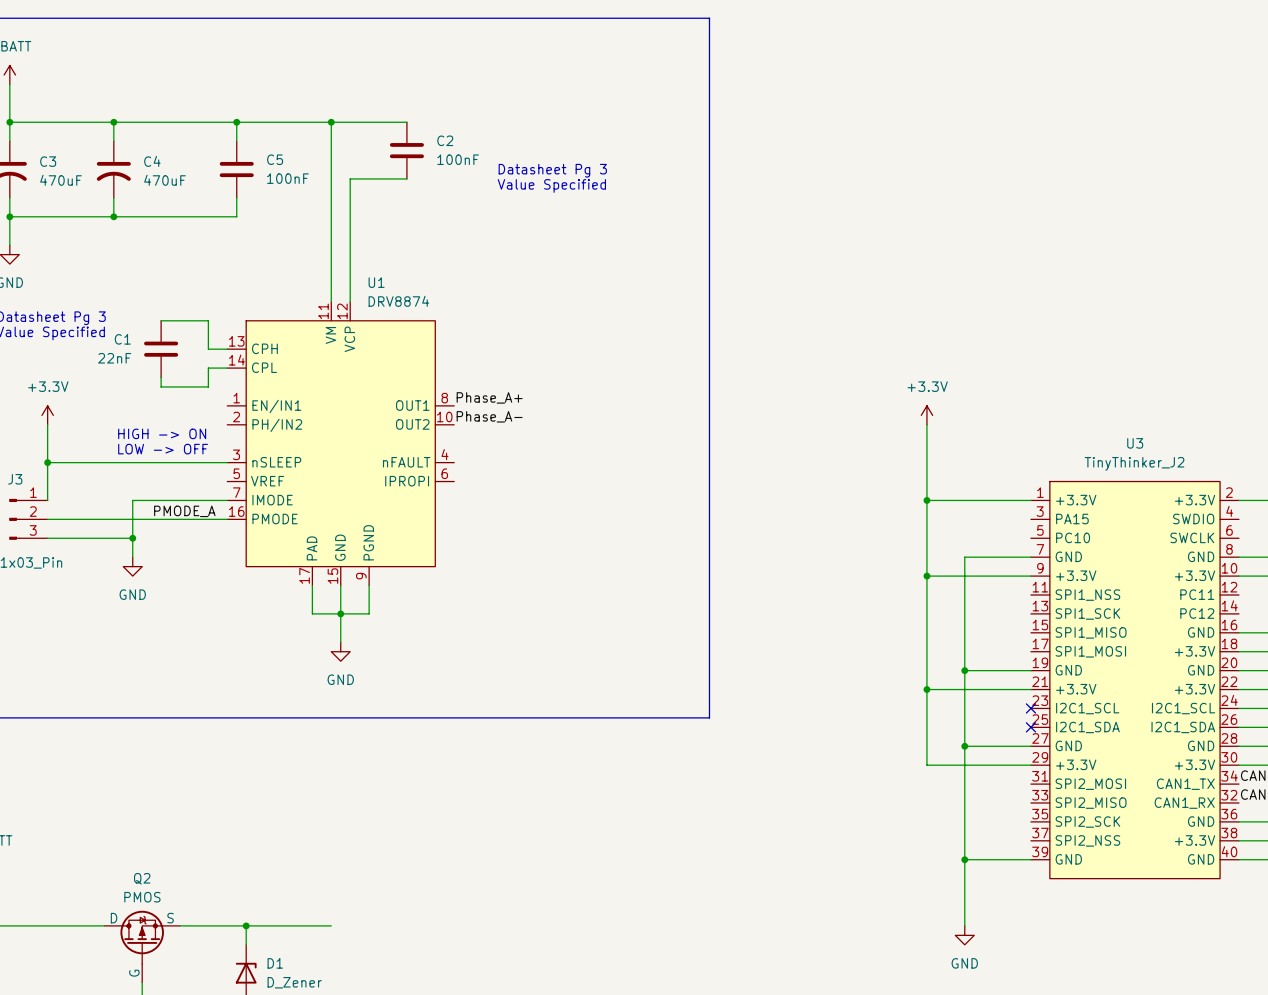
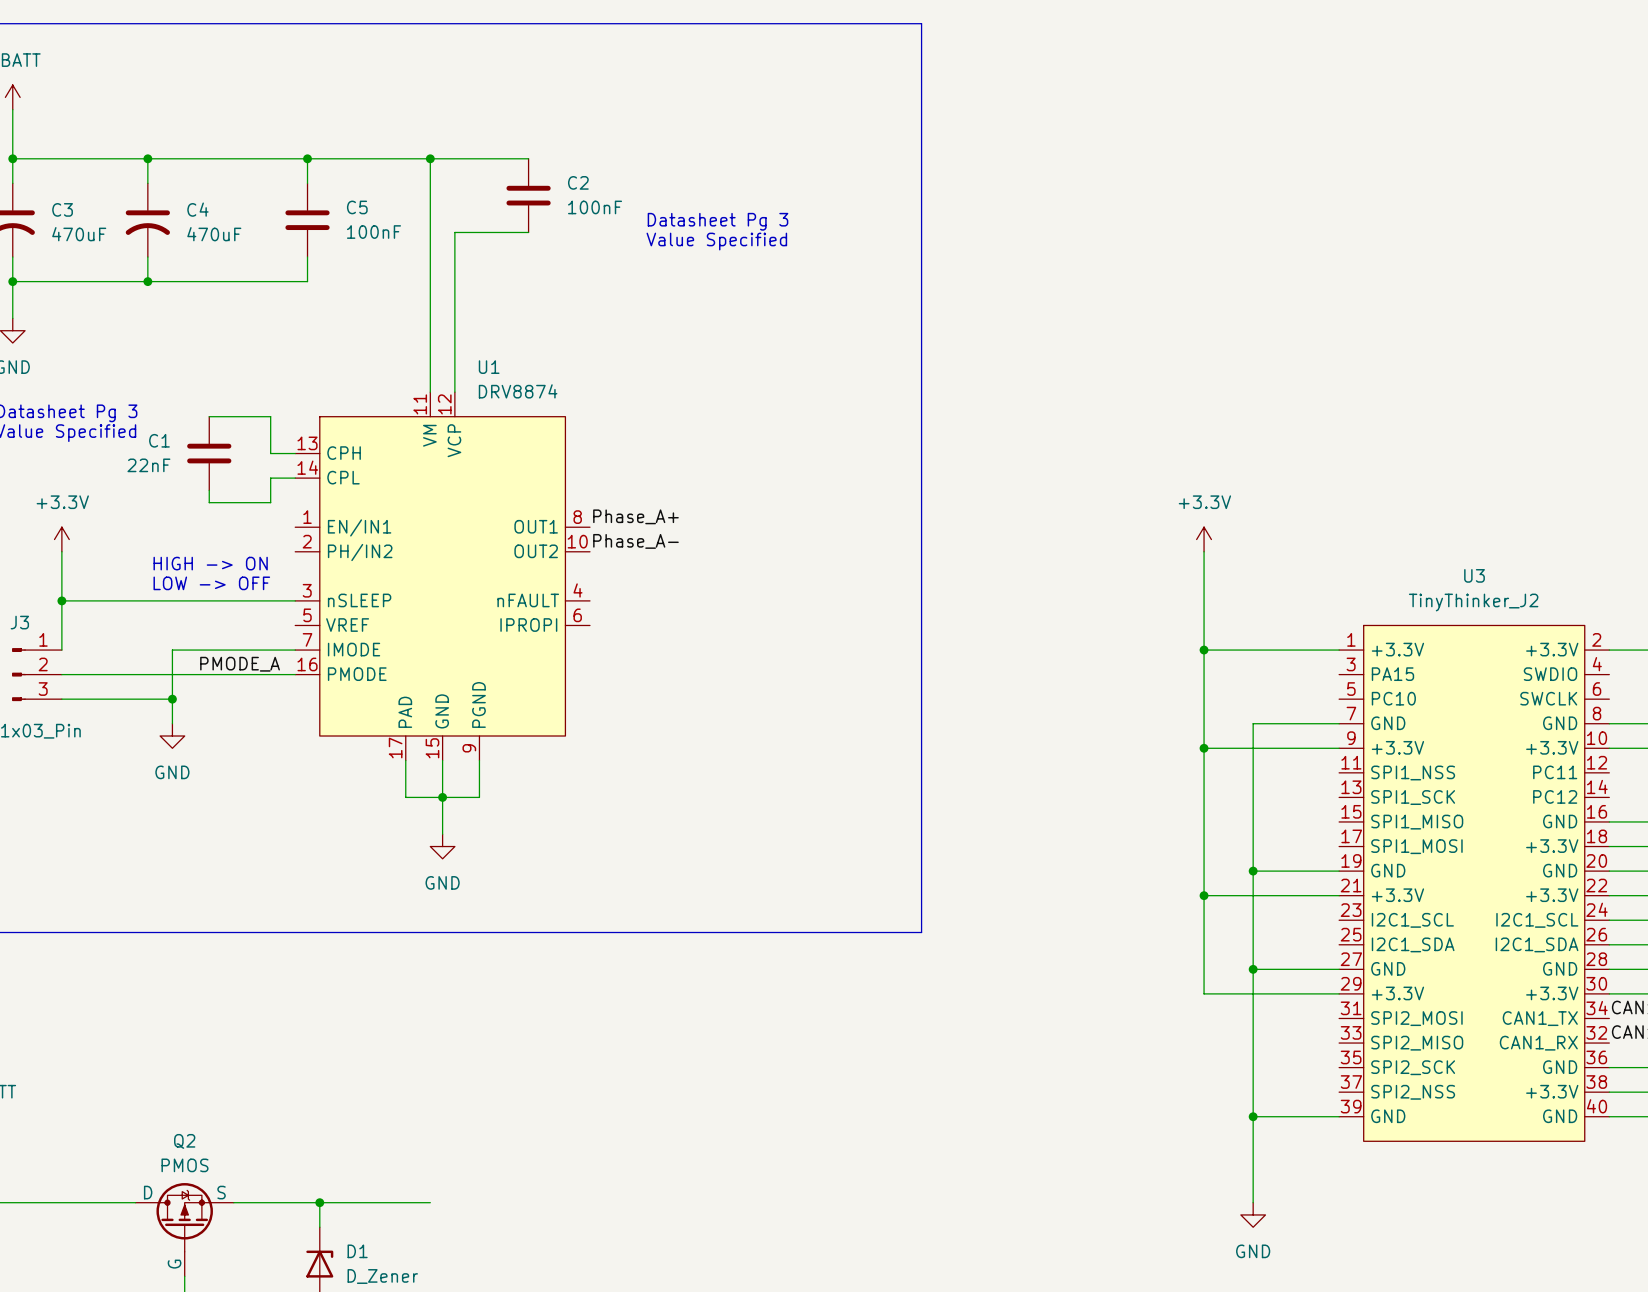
no-connect mark: (1030, 708) -> none
no-connect mark: (1030, 727) -> none

